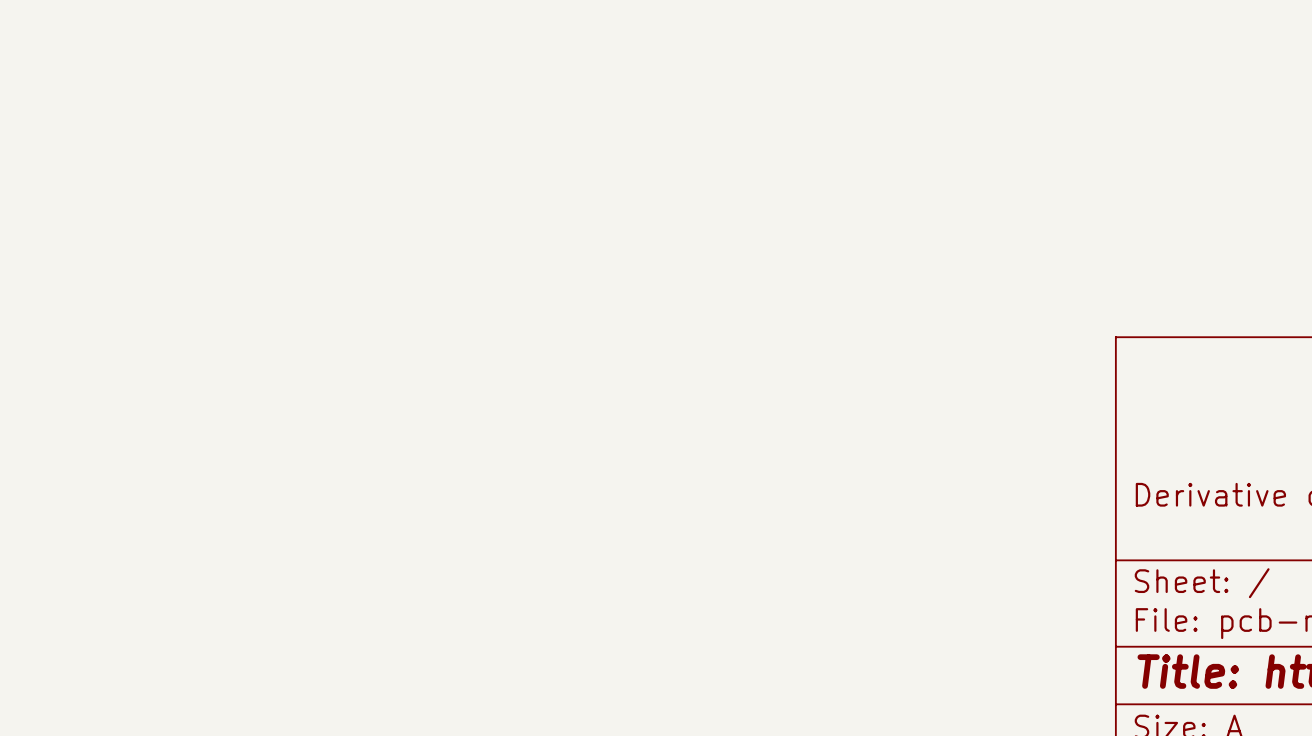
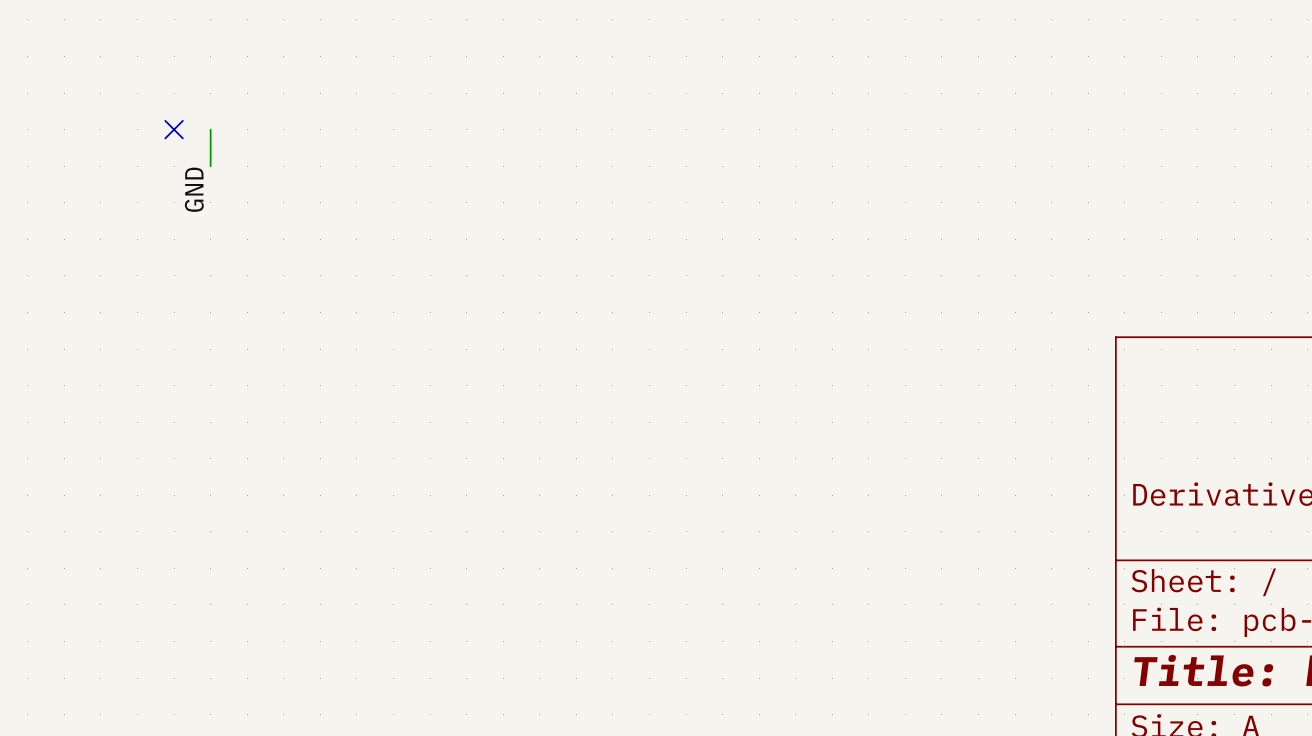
no-connect mark: none -> (174, 129)
wire: none -> (210, 129) (210, 166)
label: none -> GND (194, 189)

